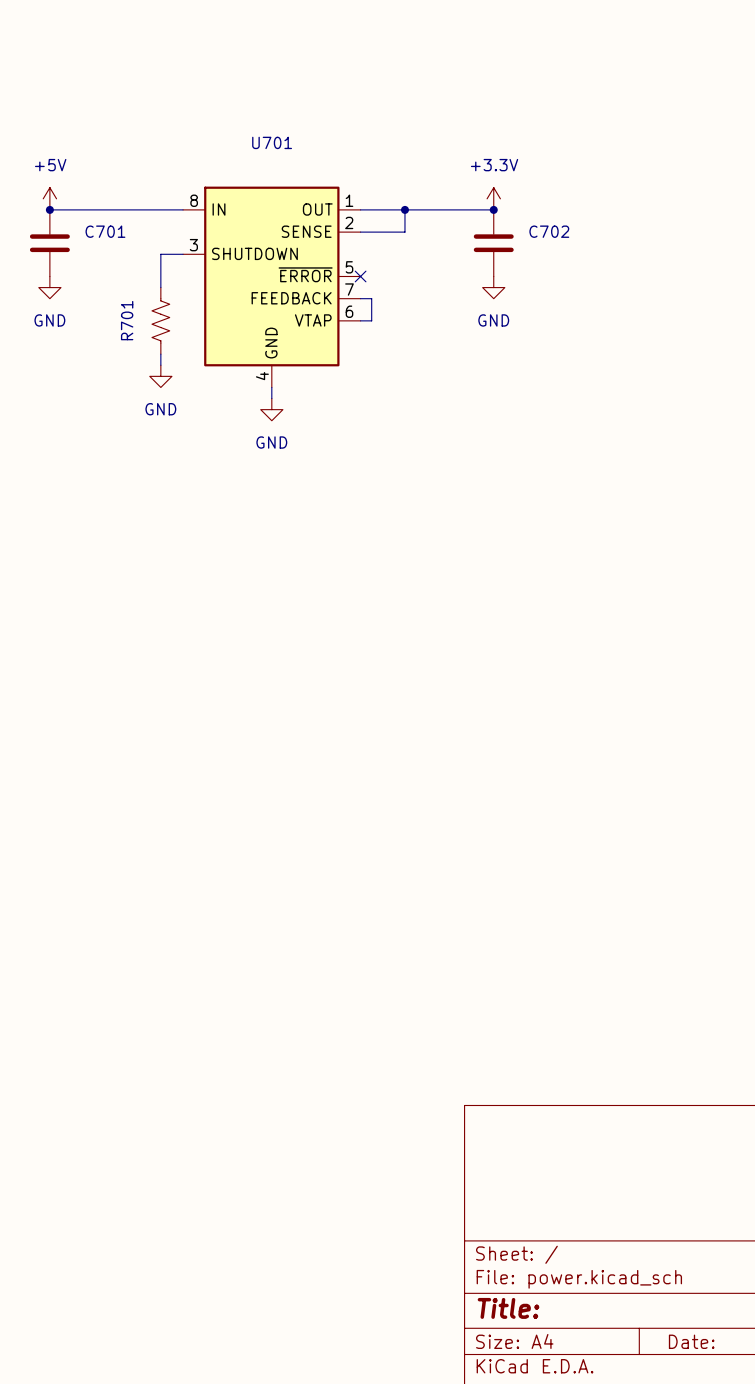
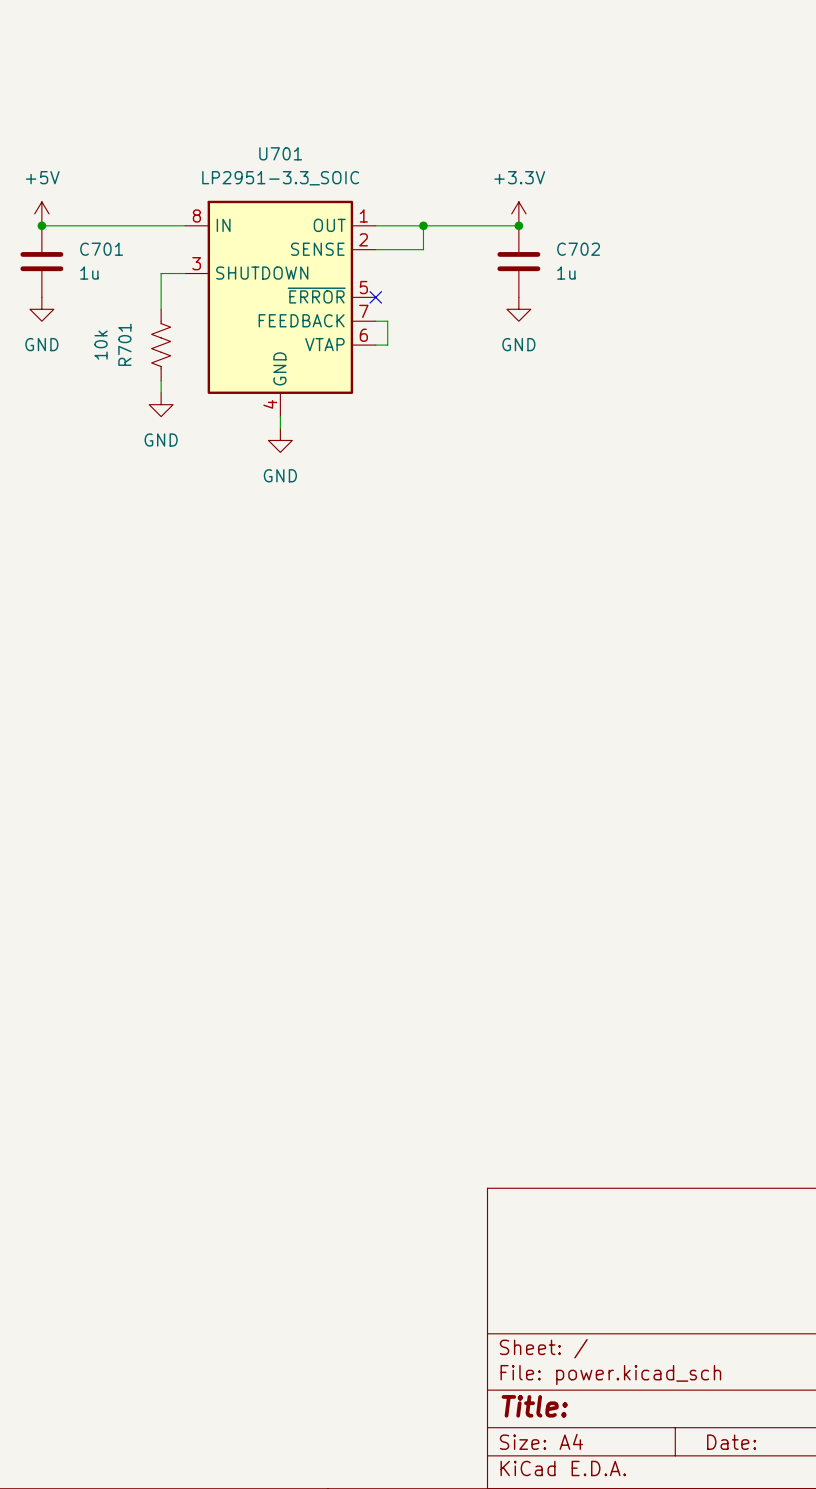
U701 value: none -> LP2951-3.3_SOIC (280, 178)
C701 value: none -> 1u (89, 273)
C702 value: none -> 1u (566, 273)
R701 value: none -> 10k (101, 345)

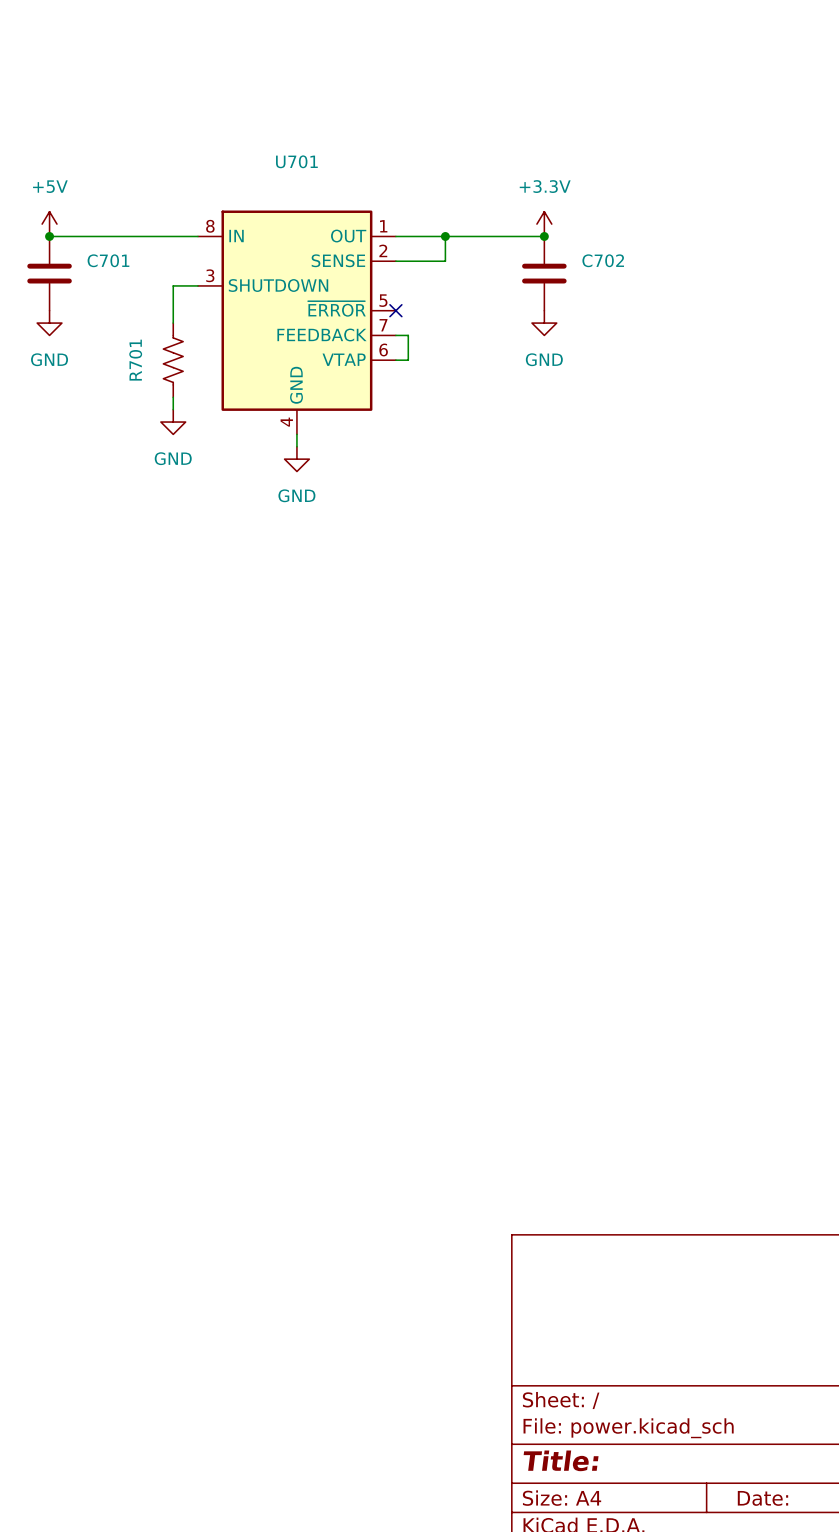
U701 value: LP2951-3.3_SOIC (280, 178) -> none
C701 value: 1u (89, 273) -> none
C702 value: 1u (566, 273) -> none
R701 value: 10k (101, 345) -> none

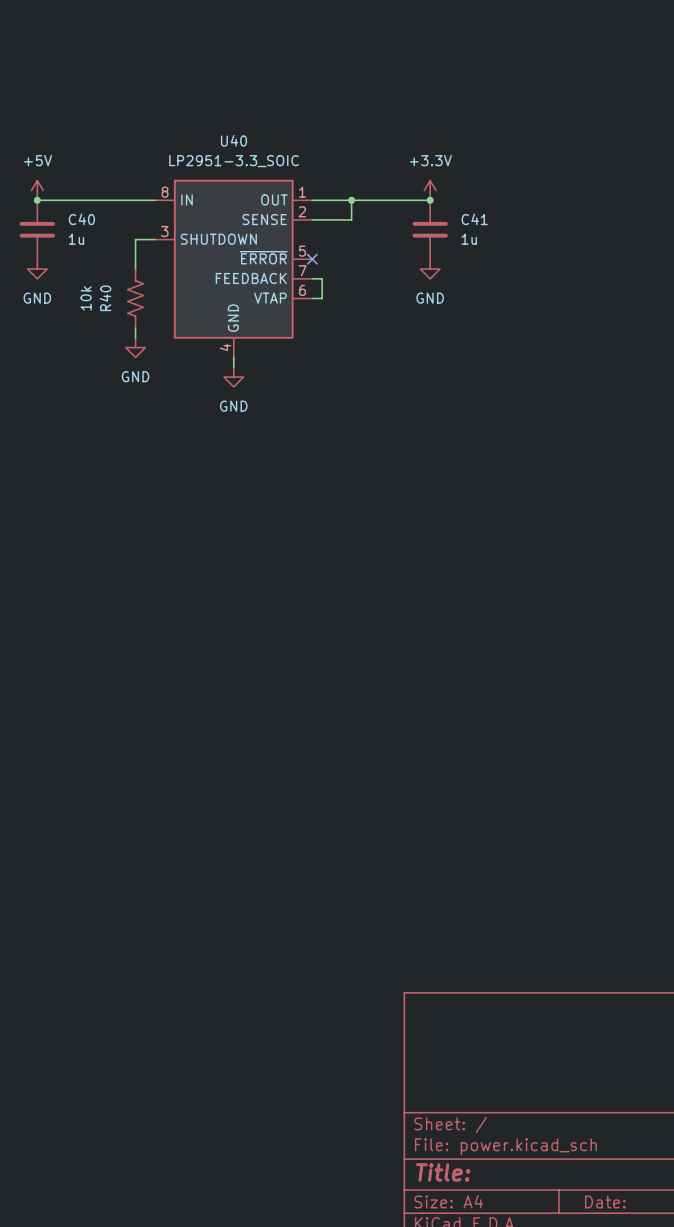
U701 name: U701 (296, 161) -> U40 (233, 140)
U701 value: none -> LP2951-3.3_SOIC (233, 161)
C701 name: C701 (108, 260) -> C40 (81, 219)
C702 name: C702 (603, 260) -> C41 (474, 219)
C701 value: none -> 1u (76, 239)
C702 value: none -> 1u (469, 239)
R701 value: none -> 10k (86, 298)
R701 name: R701 (135, 360) -> R40 (105, 298)

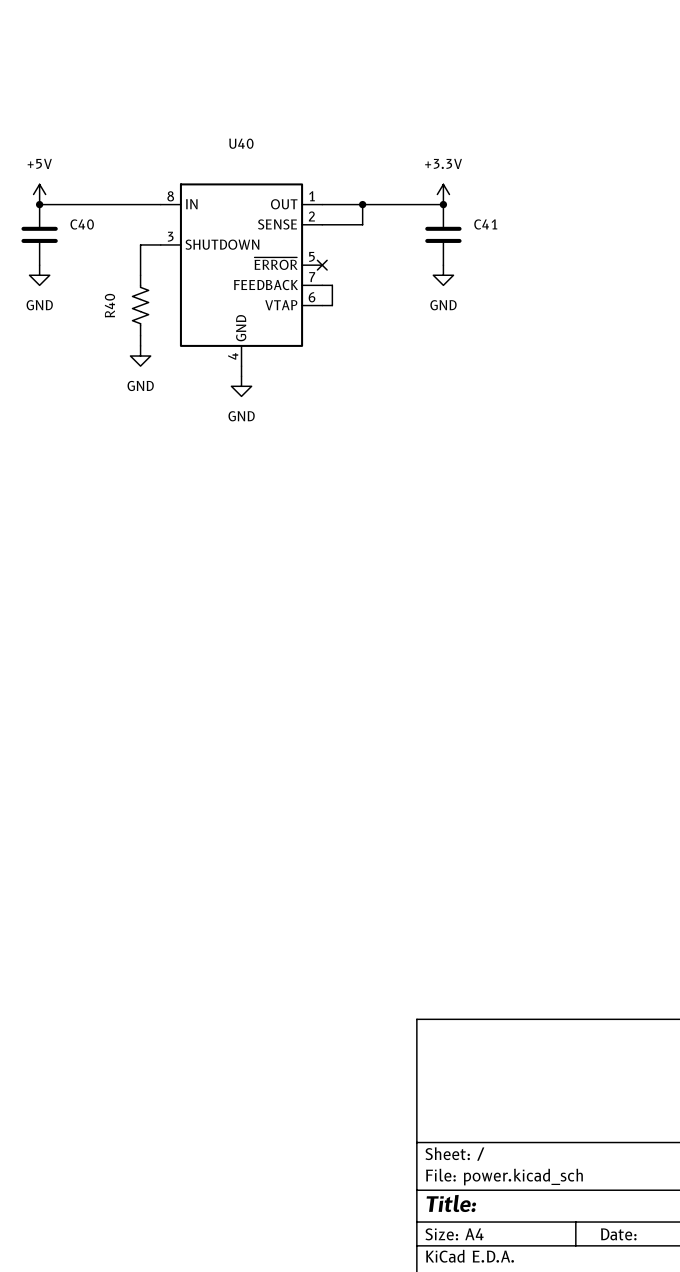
U40 value: LP2951-3.3_SOIC (233, 161) -> none
C40 value: 1u (76, 239) -> none
C41 value: 1u (469, 239) -> none
R40 value: 10k (86, 298) -> none

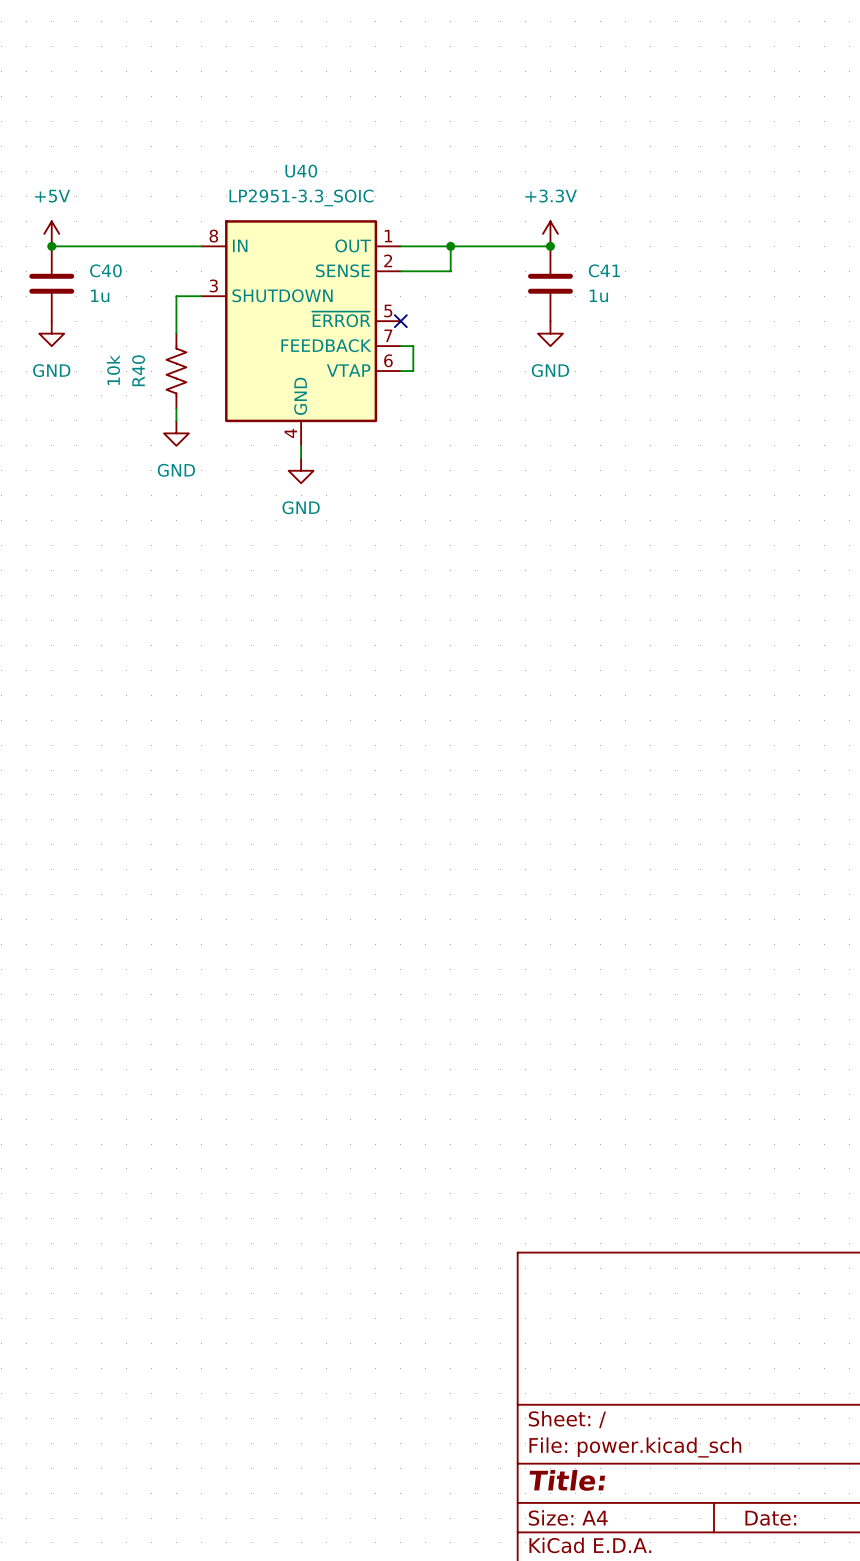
U40 value: none -> LP2951-3.3_SOIC (301, 197)
C40 value: none -> 1u (100, 295)
C41 value: none -> 1u (598, 295)
R40 value: none -> 10k (113, 370)

